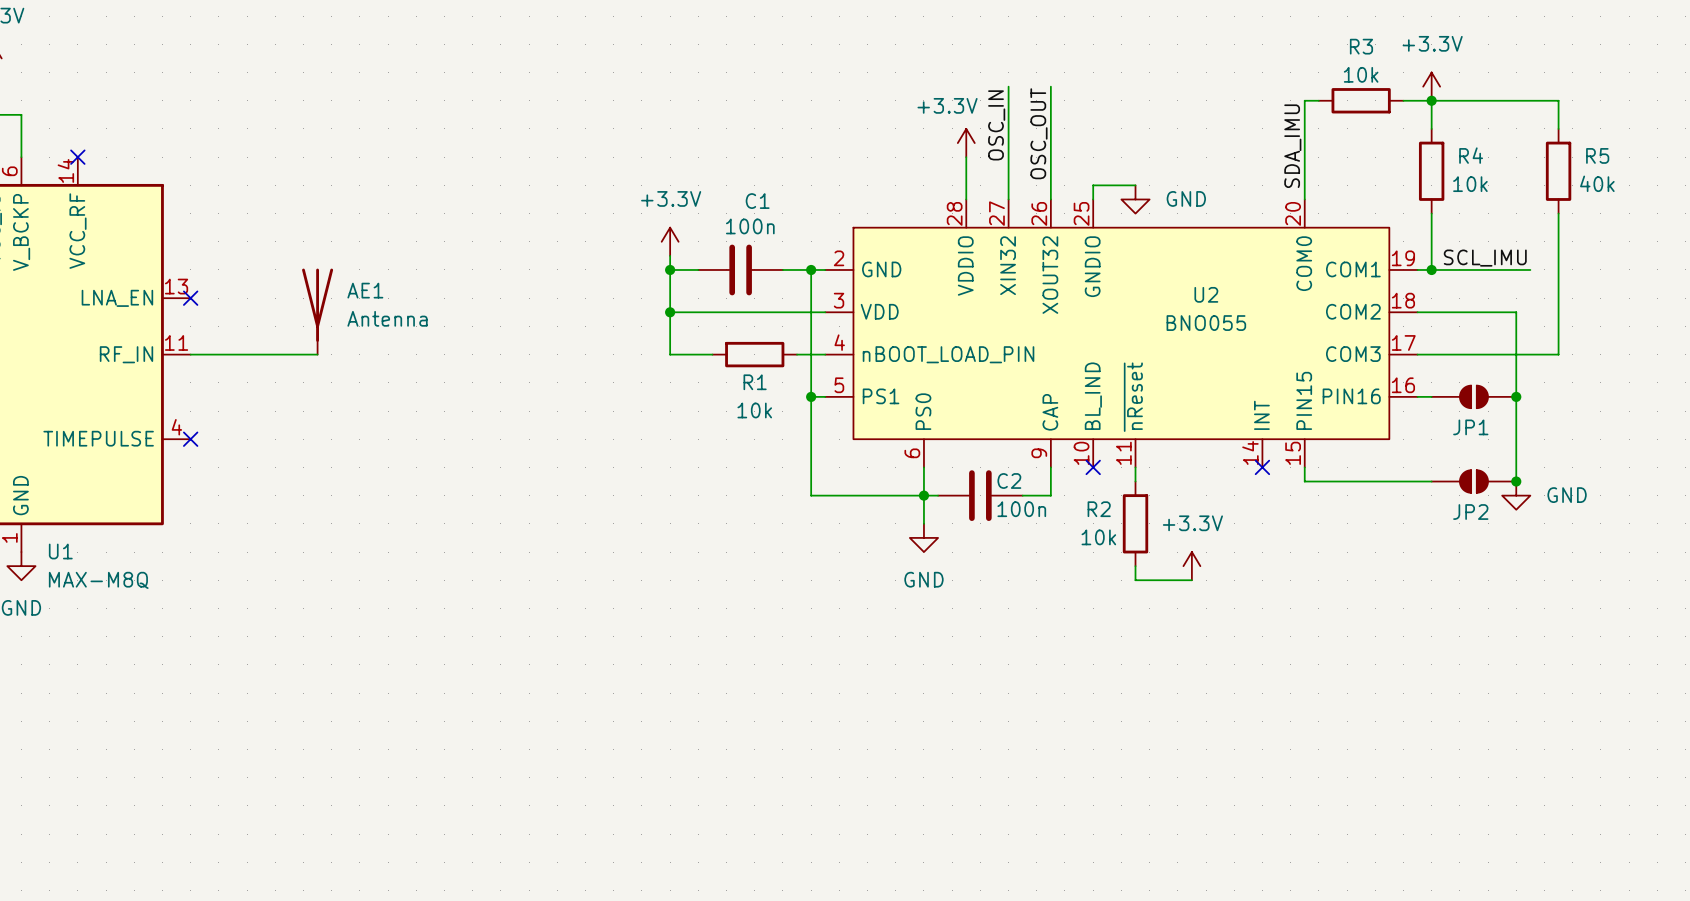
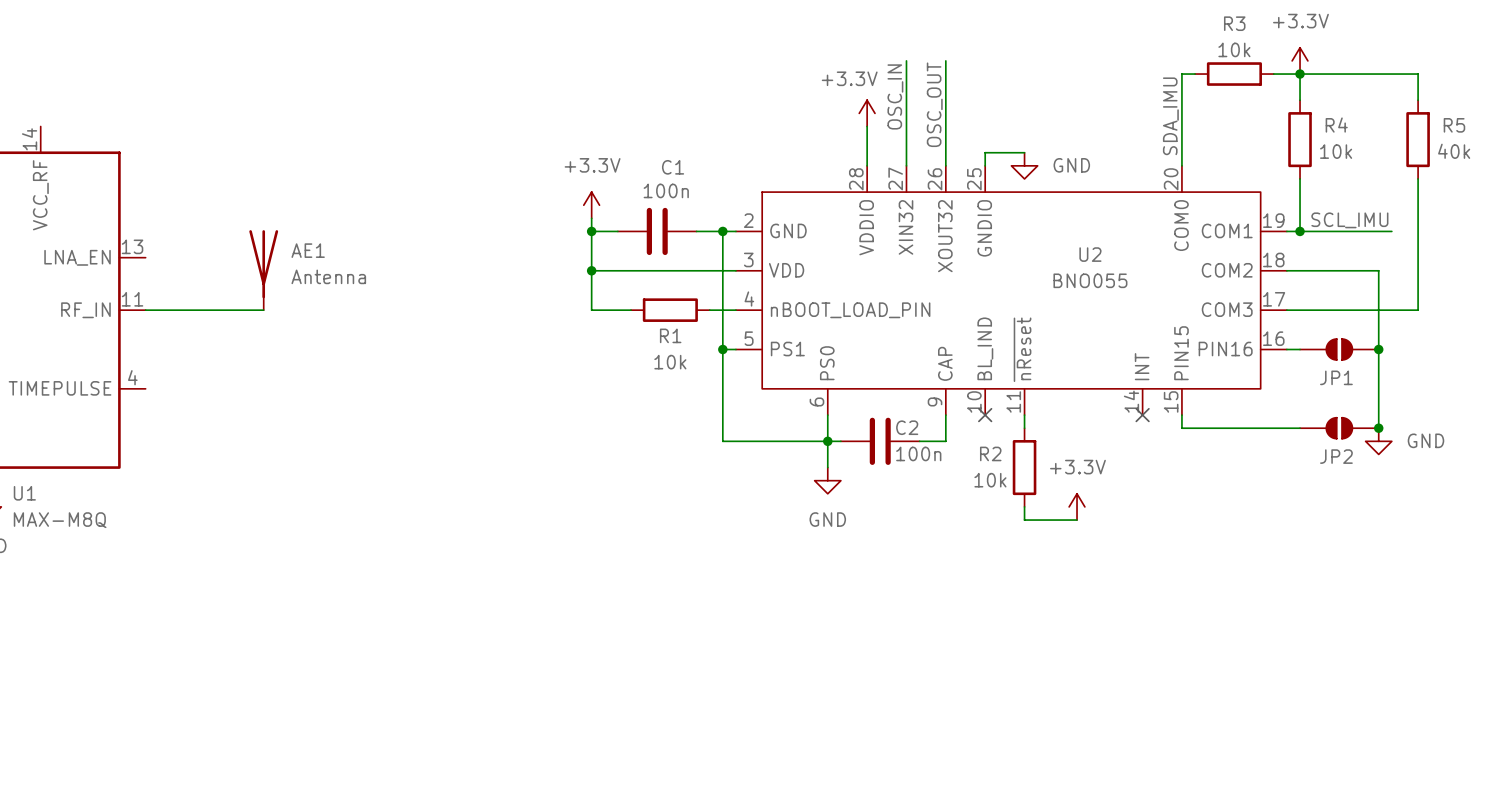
no-connect mark: (77, 157) -> none
no-connect mark: (190, 298) -> none
no-connect mark: (190, 439) -> none

